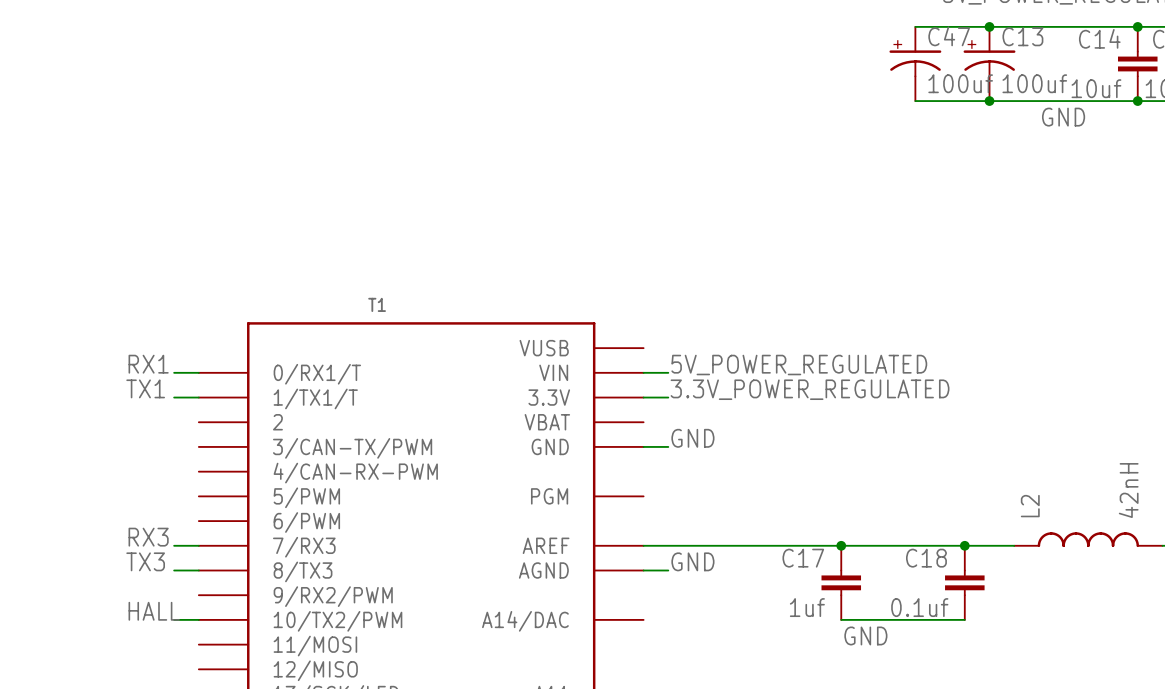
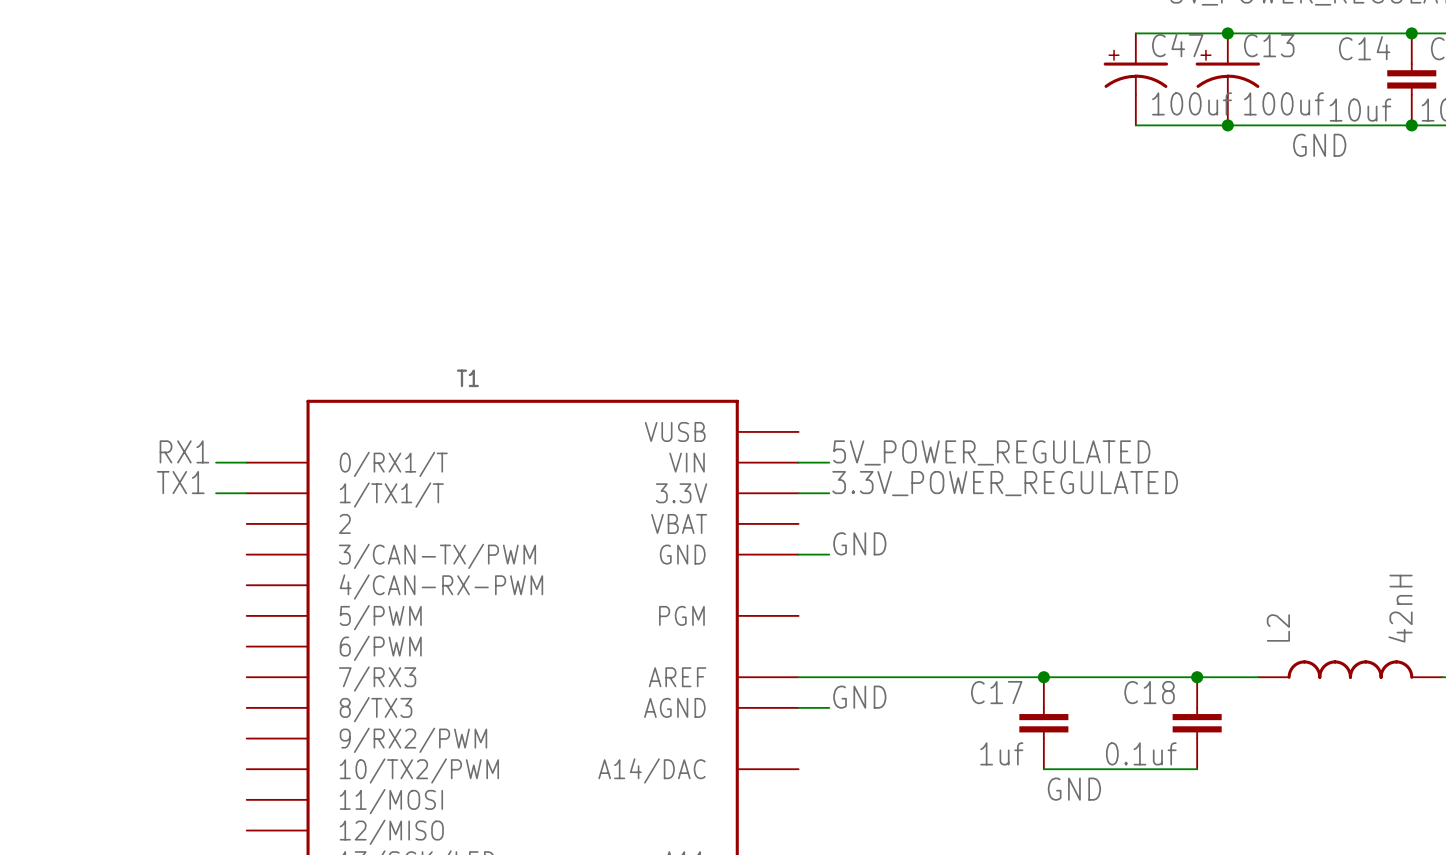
label: RX3 (148, 537) -> none
wire: (174, 545) (198, 545) -> none
label: TX3 (145, 561) -> none
wire: (174, 570) (198, 570) -> none
label: HALL (154, 611) -> none
wire: (174, 619) (198, 619) -> none

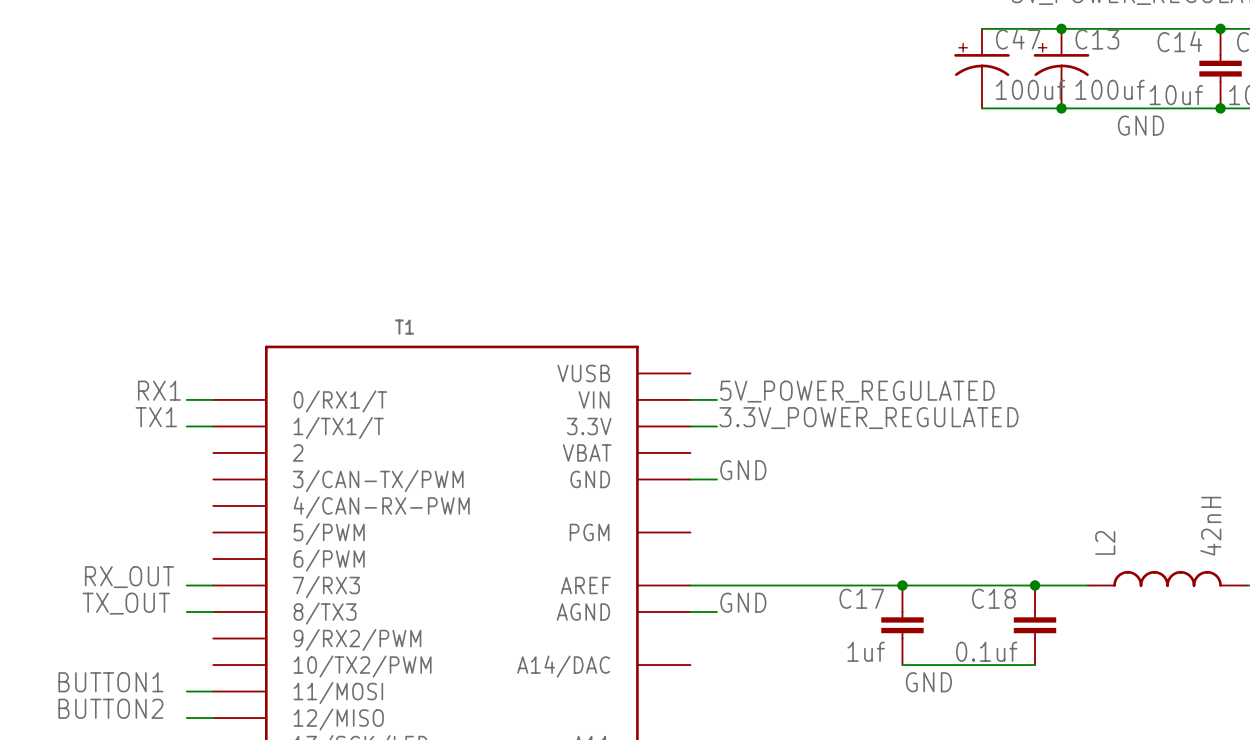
label: none -> RX_OUT (129, 577)
wire: none -> (186, 585) (213, 585)
label: none -> TX_OUT (126, 603)
wire: none -> (186, 612) (213, 612)
label: none -> BUTTON1 (110, 682)
wire: none -> (186, 691) (213, 691)
label: none -> BUTTON2 (110, 708)
wire: none -> (186, 718) (213, 718)

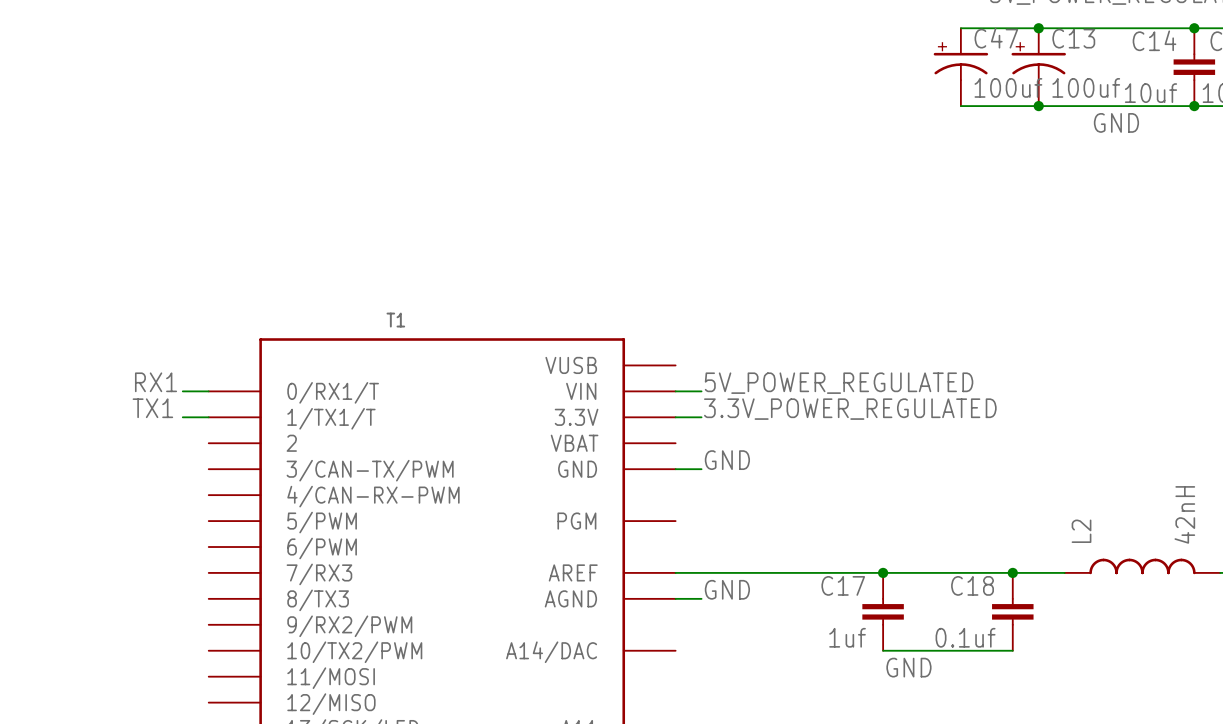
label: RX_OUT (129, 577) -> none
wire: (186, 585) (213, 585) -> none
label: TX_OUT (126, 603) -> none
wire: (186, 612) (213, 612) -> none
label: BUTTON1 (110, 682) -> none
wire: (186, 691) (213, 691) -> none
label: BUTTON2 (110, 708) -> none
wire: (186, 718) (213, 718) -> none

